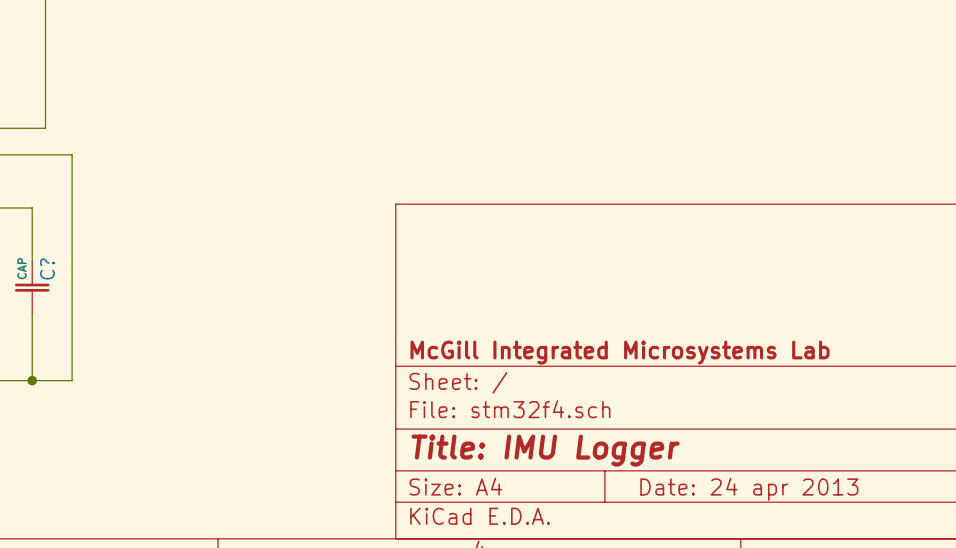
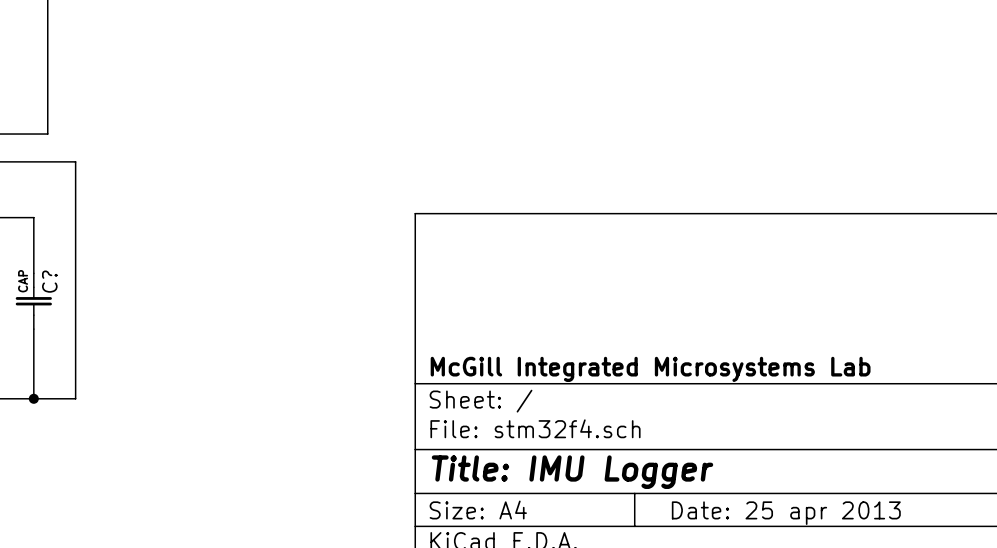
title block: Date: 24 apr 2013 (749, 489) -> Date: 25 apr 2013 (786, 513)

